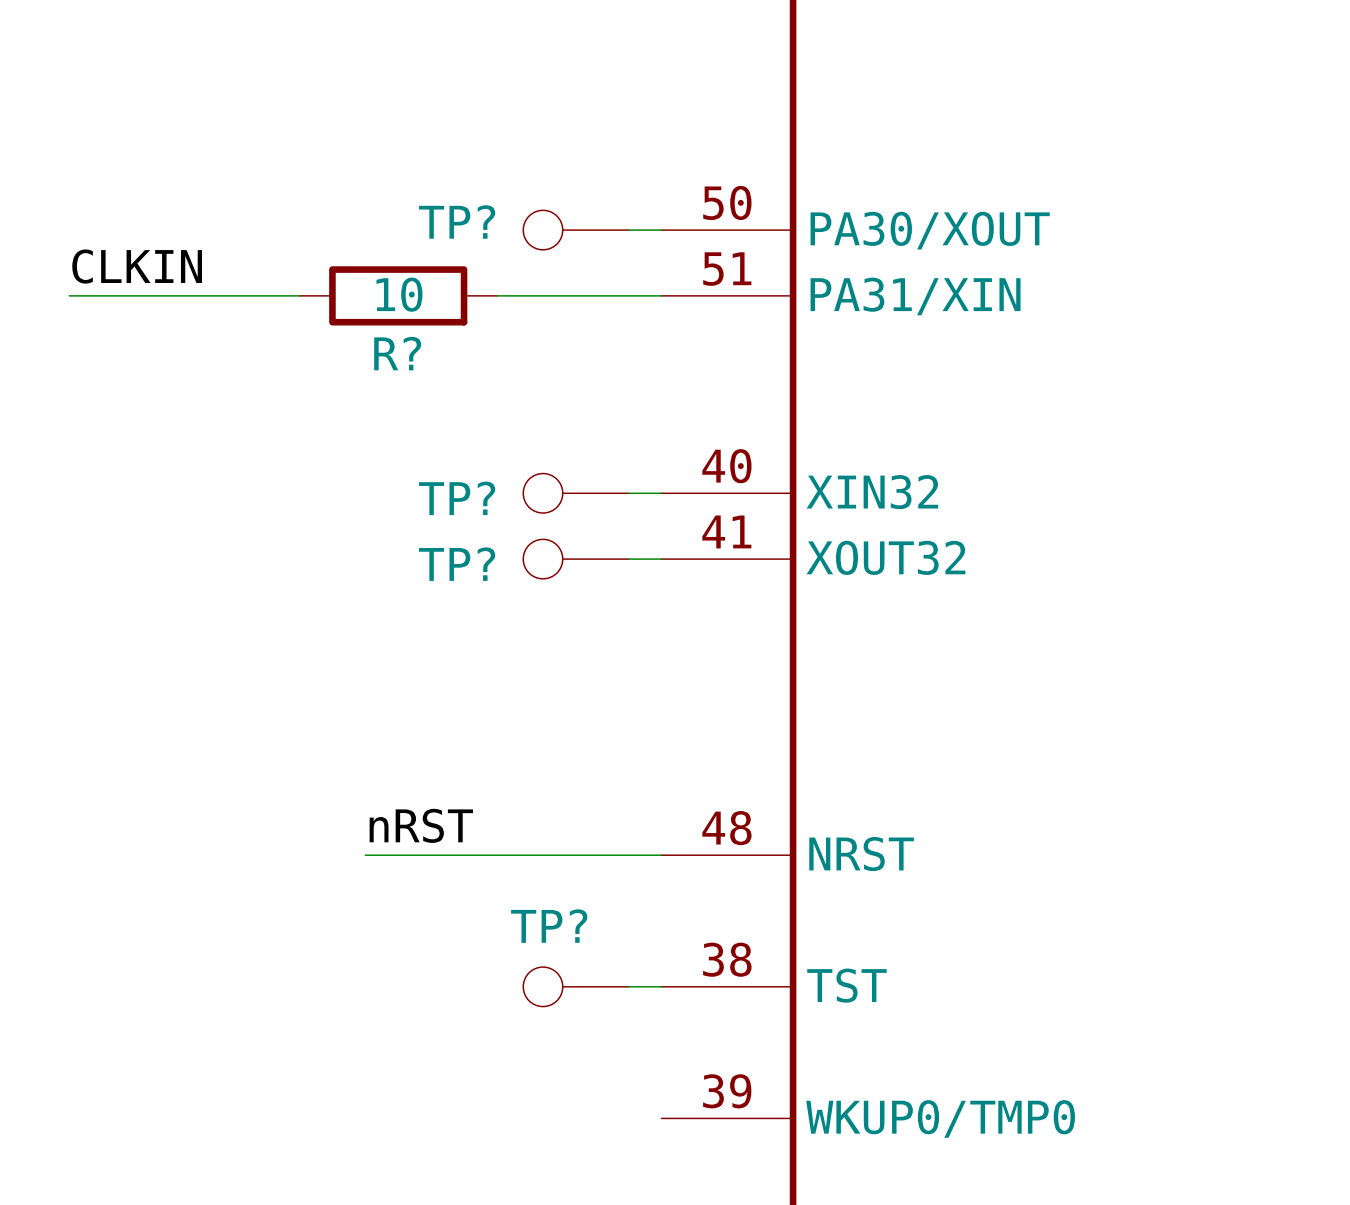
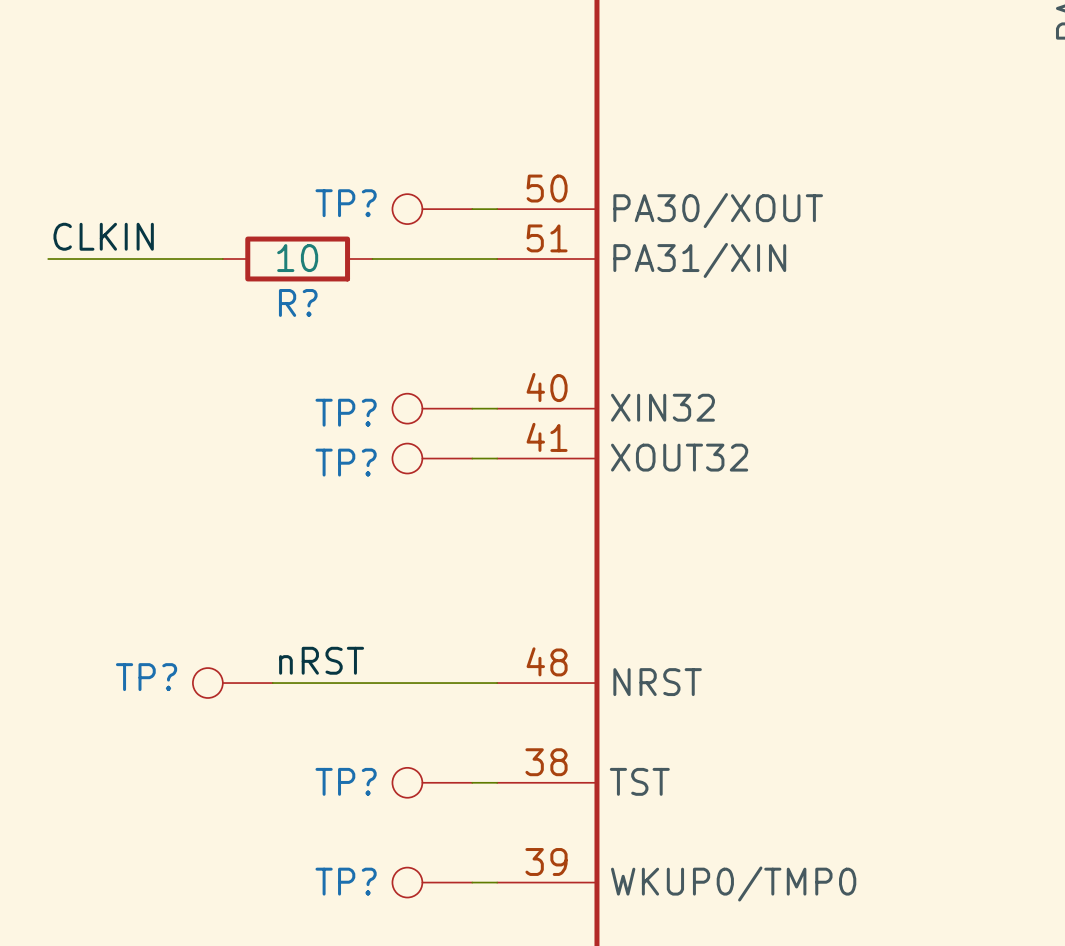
TP?: none -> (232, 683)
TP? name position: TP? (549, 926) -> TP? (346, 781)
TP?: none -> (432, 882)
wire: none -> (472, 882) (497, 882)

